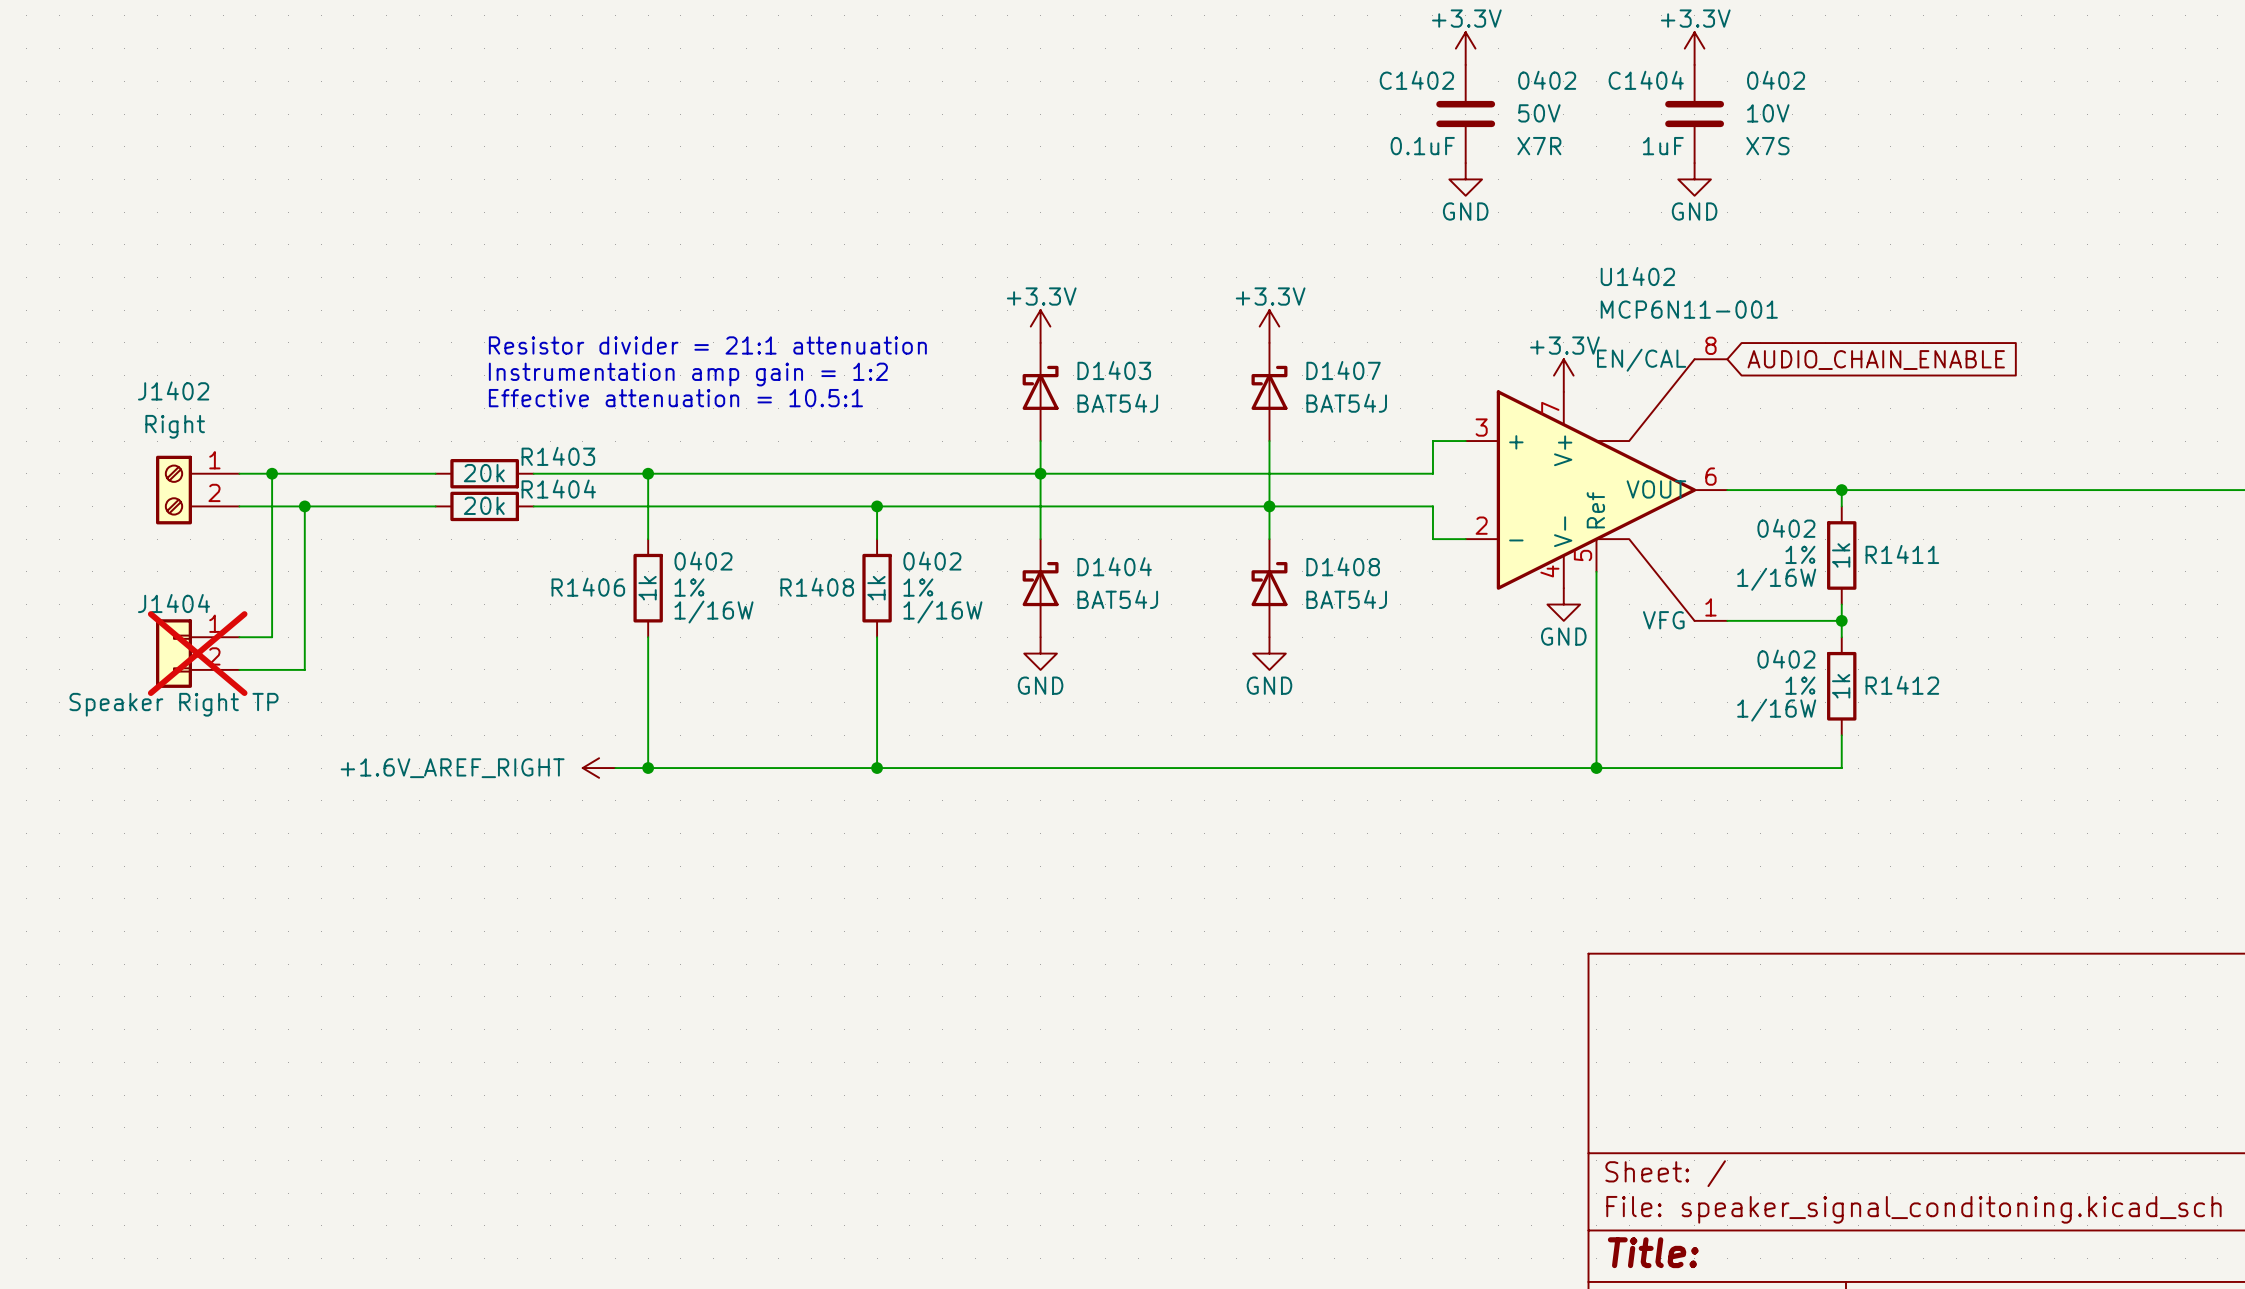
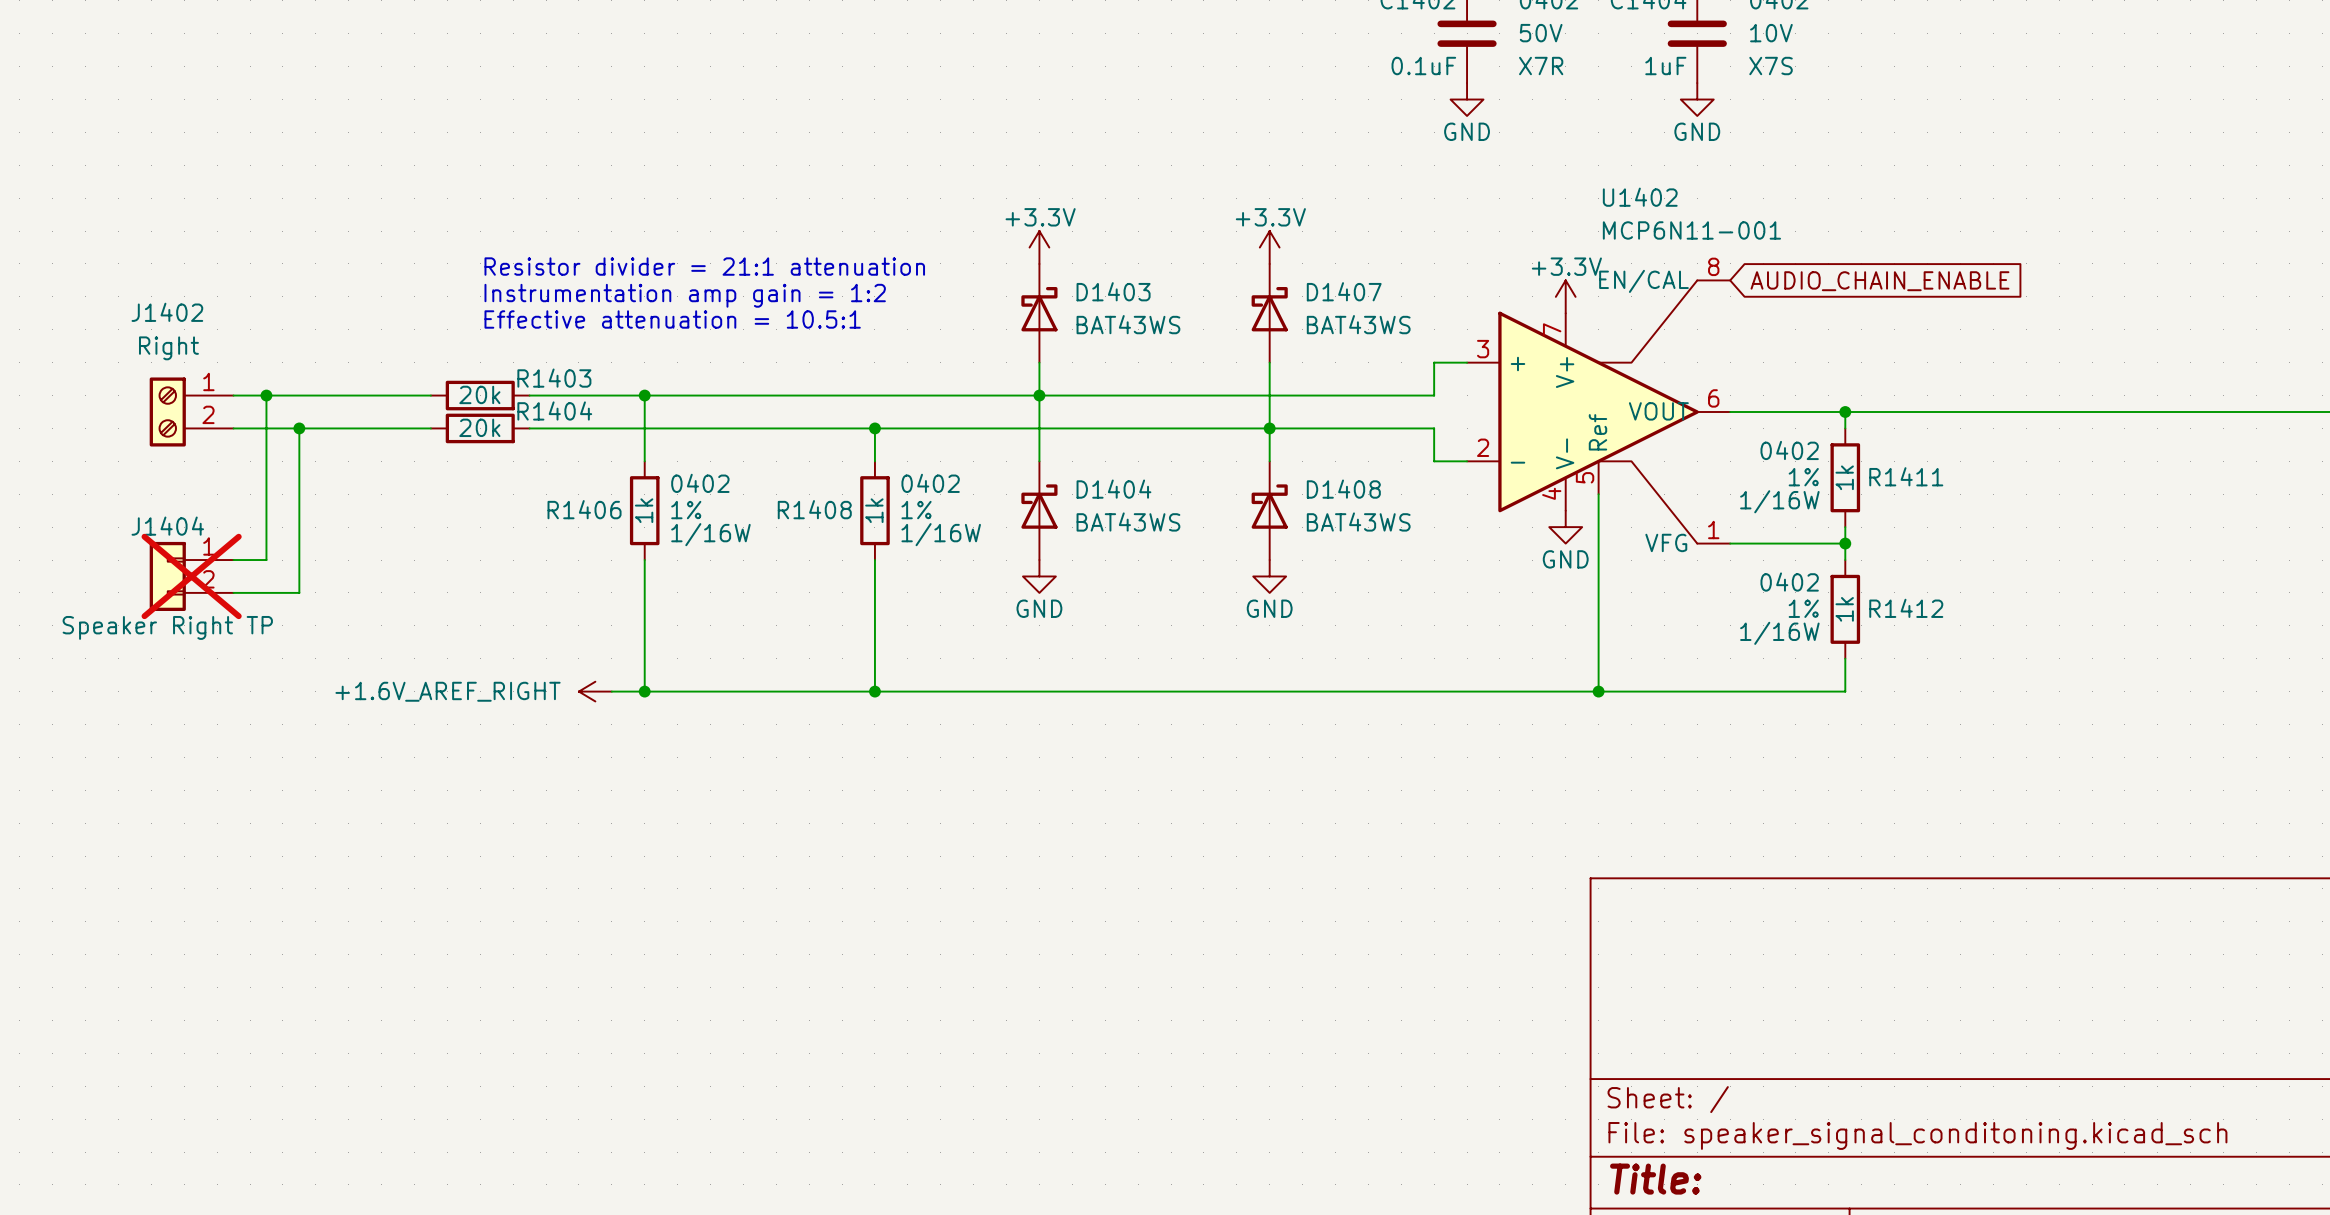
D1403 value: BAT54J (1117, 403) -> BAT43WS (1128, 324)
D1407 value: BAT54J (1346, 403) -> BAT43WS (1358, 324)
D1404 value: BAT54J (1117, 599) -> BAT43WS (1128, 522)
D1408 value: BAT54J (1346, 599) -> BAT43WS (1358, 522)

